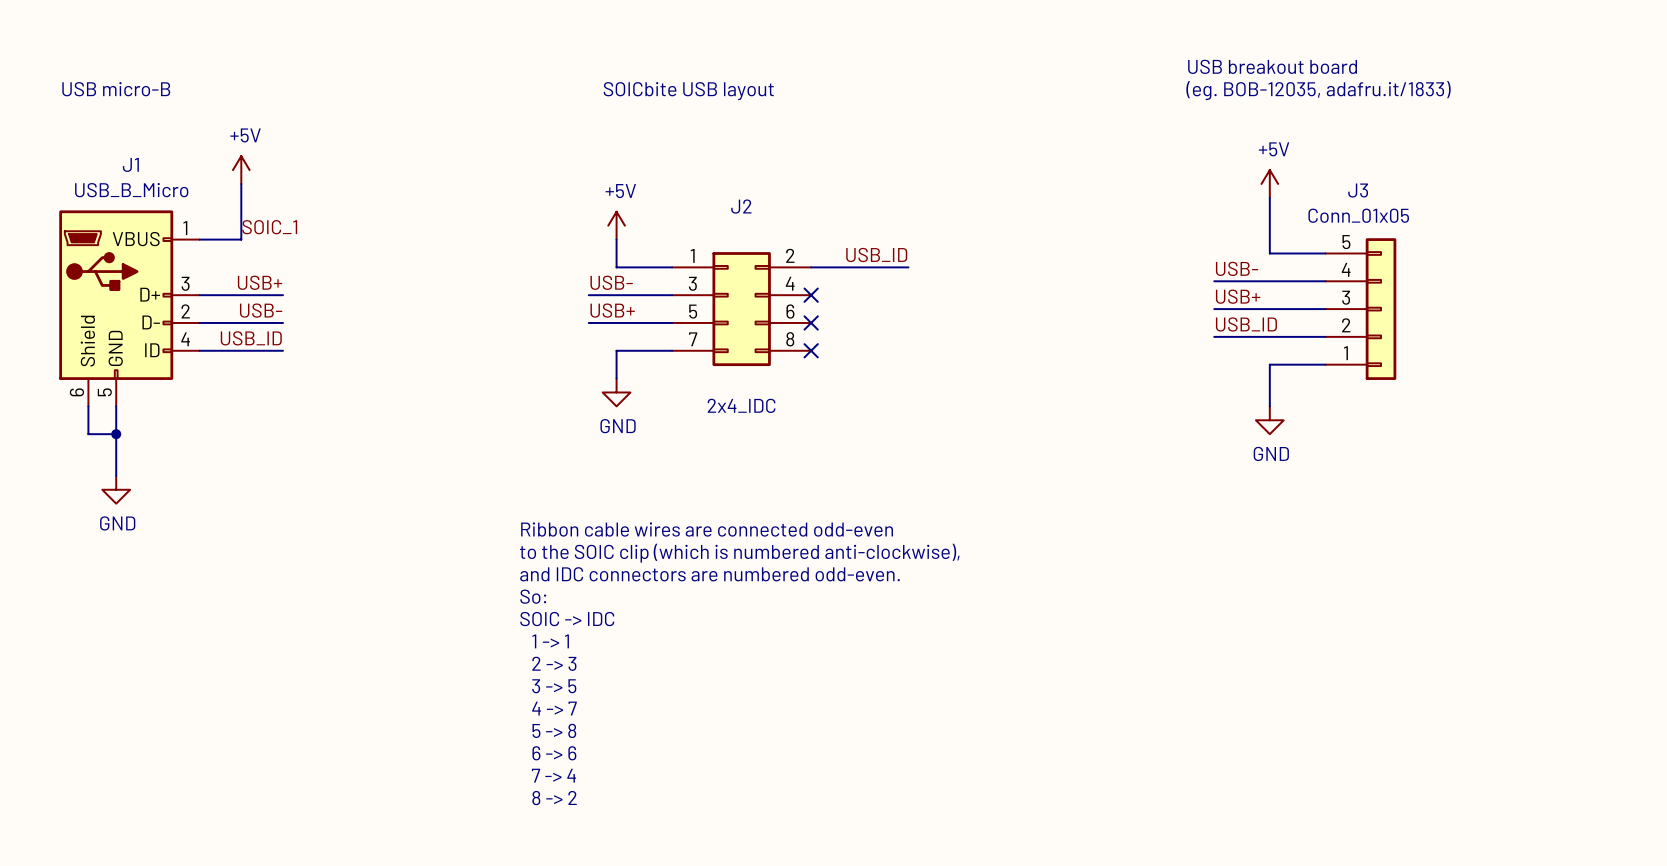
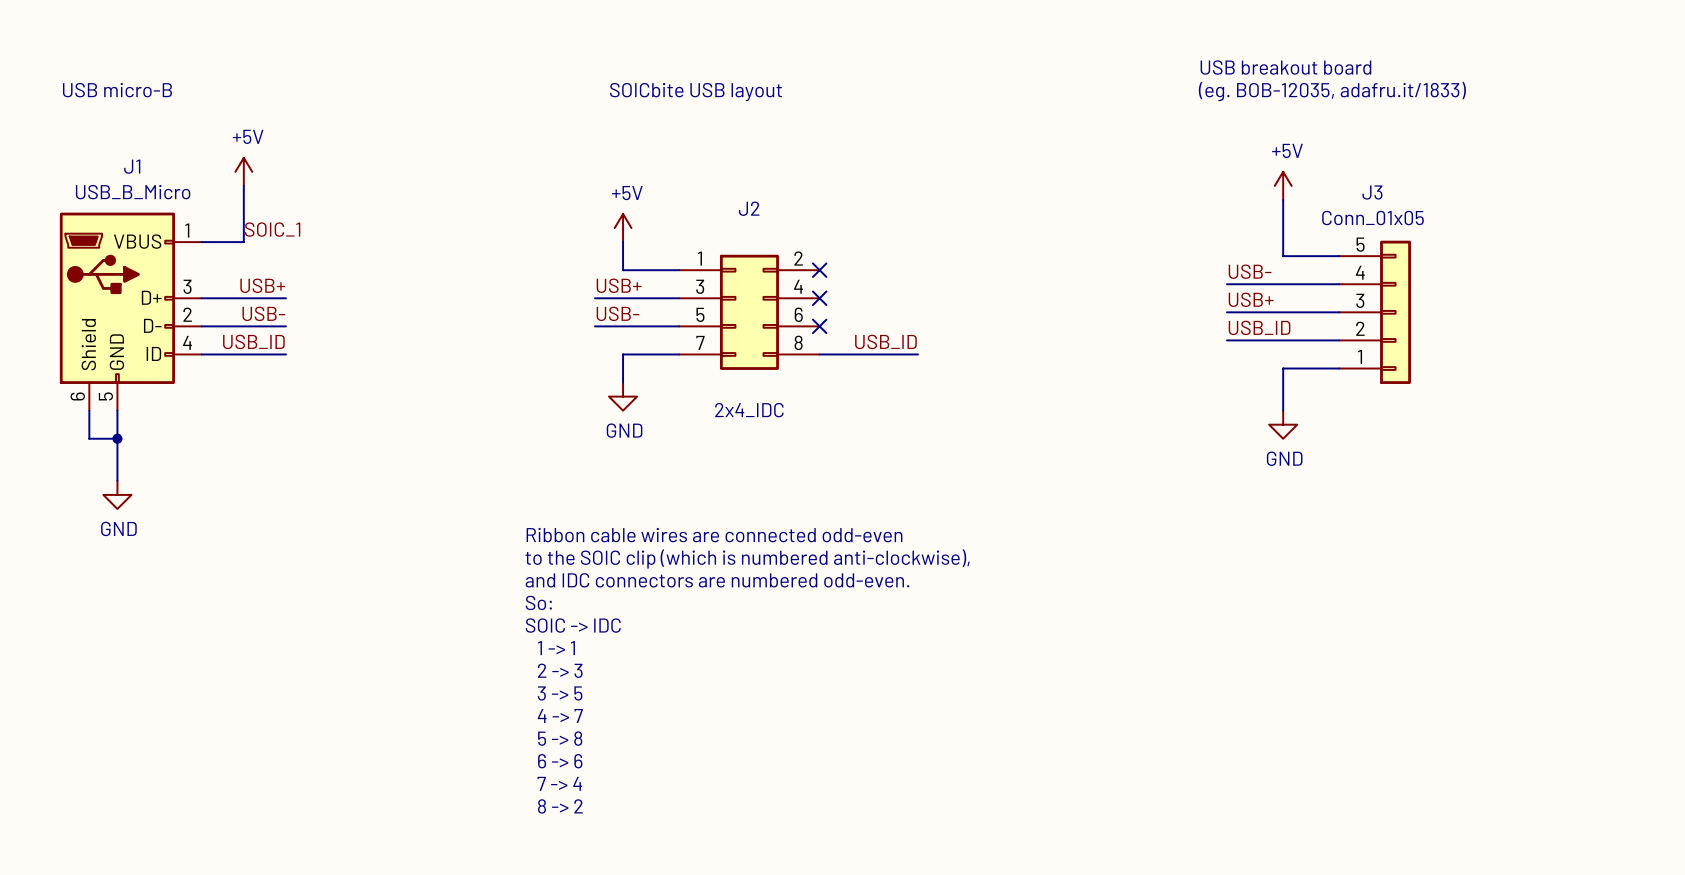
label position: USB_ID (876, 254) -> USB_ID (885, 341)
wire: (811, 267) (908, 267) -> (819, 354) (918, 354)
no-connect mark: none -> (819, 270)
label: USB- (611, 282) -> USB+ (619, 285)
label: USB+ (612, 310) -> USB- (618, 313)
no-connect mark: (811, 350) -> none

